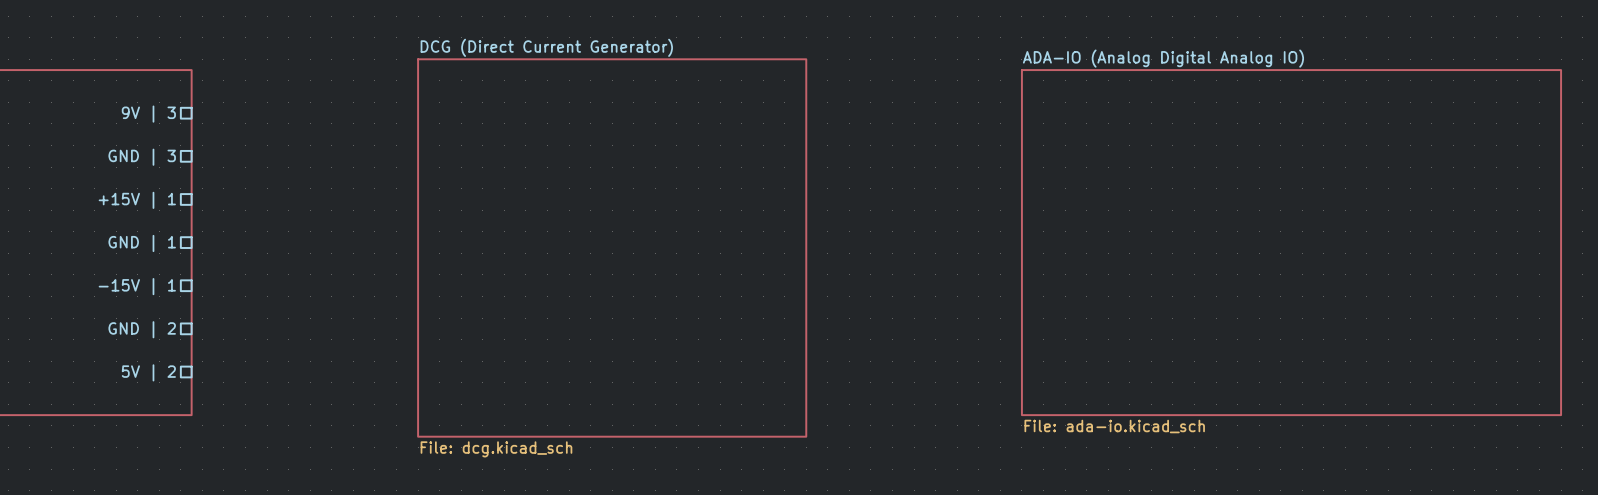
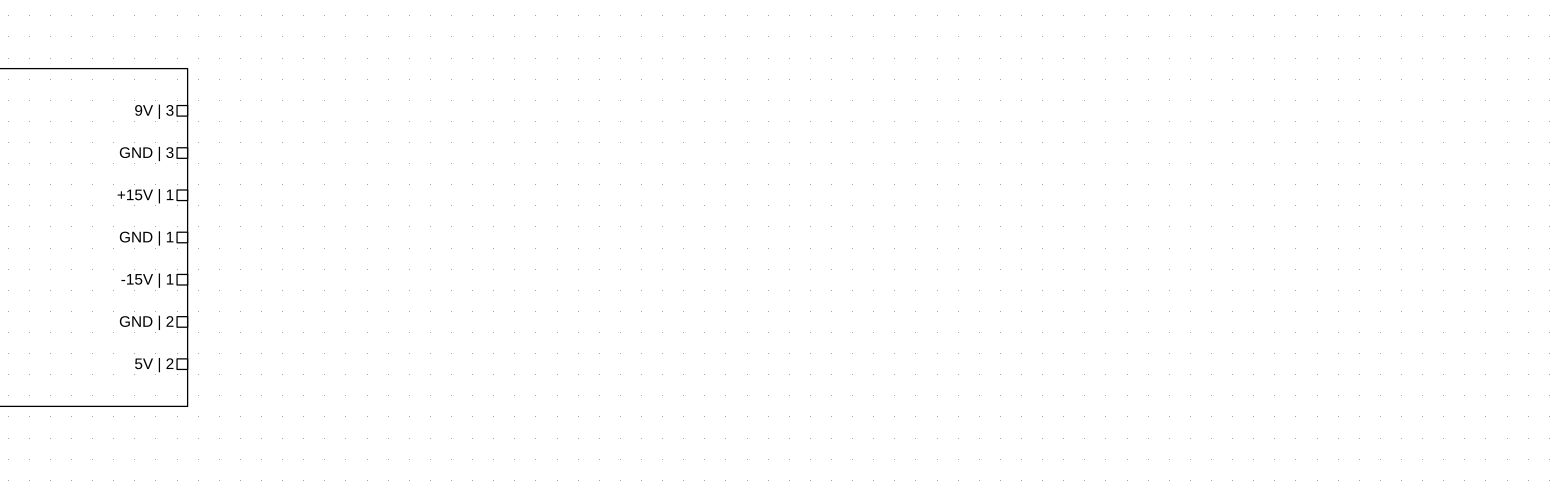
sheet ADA-IO (Analog Digital Analog IO): File: ada-io.kicad_sch (1291, 242) -> none
sheet DCG (Direct Current Generator): File: dcg.kicad_sch (612, 247) -> none

